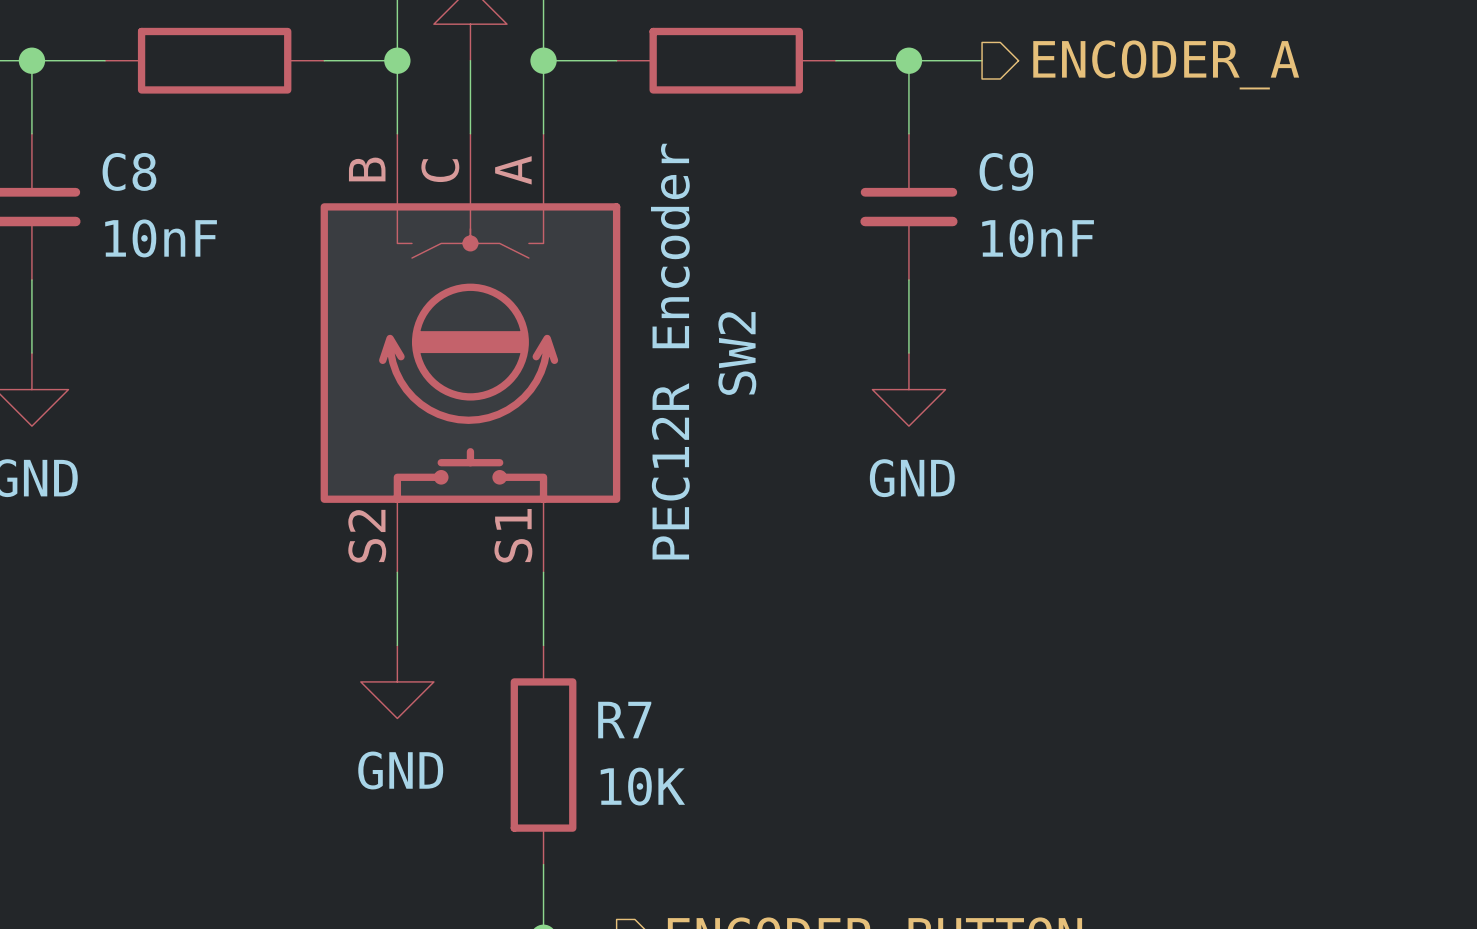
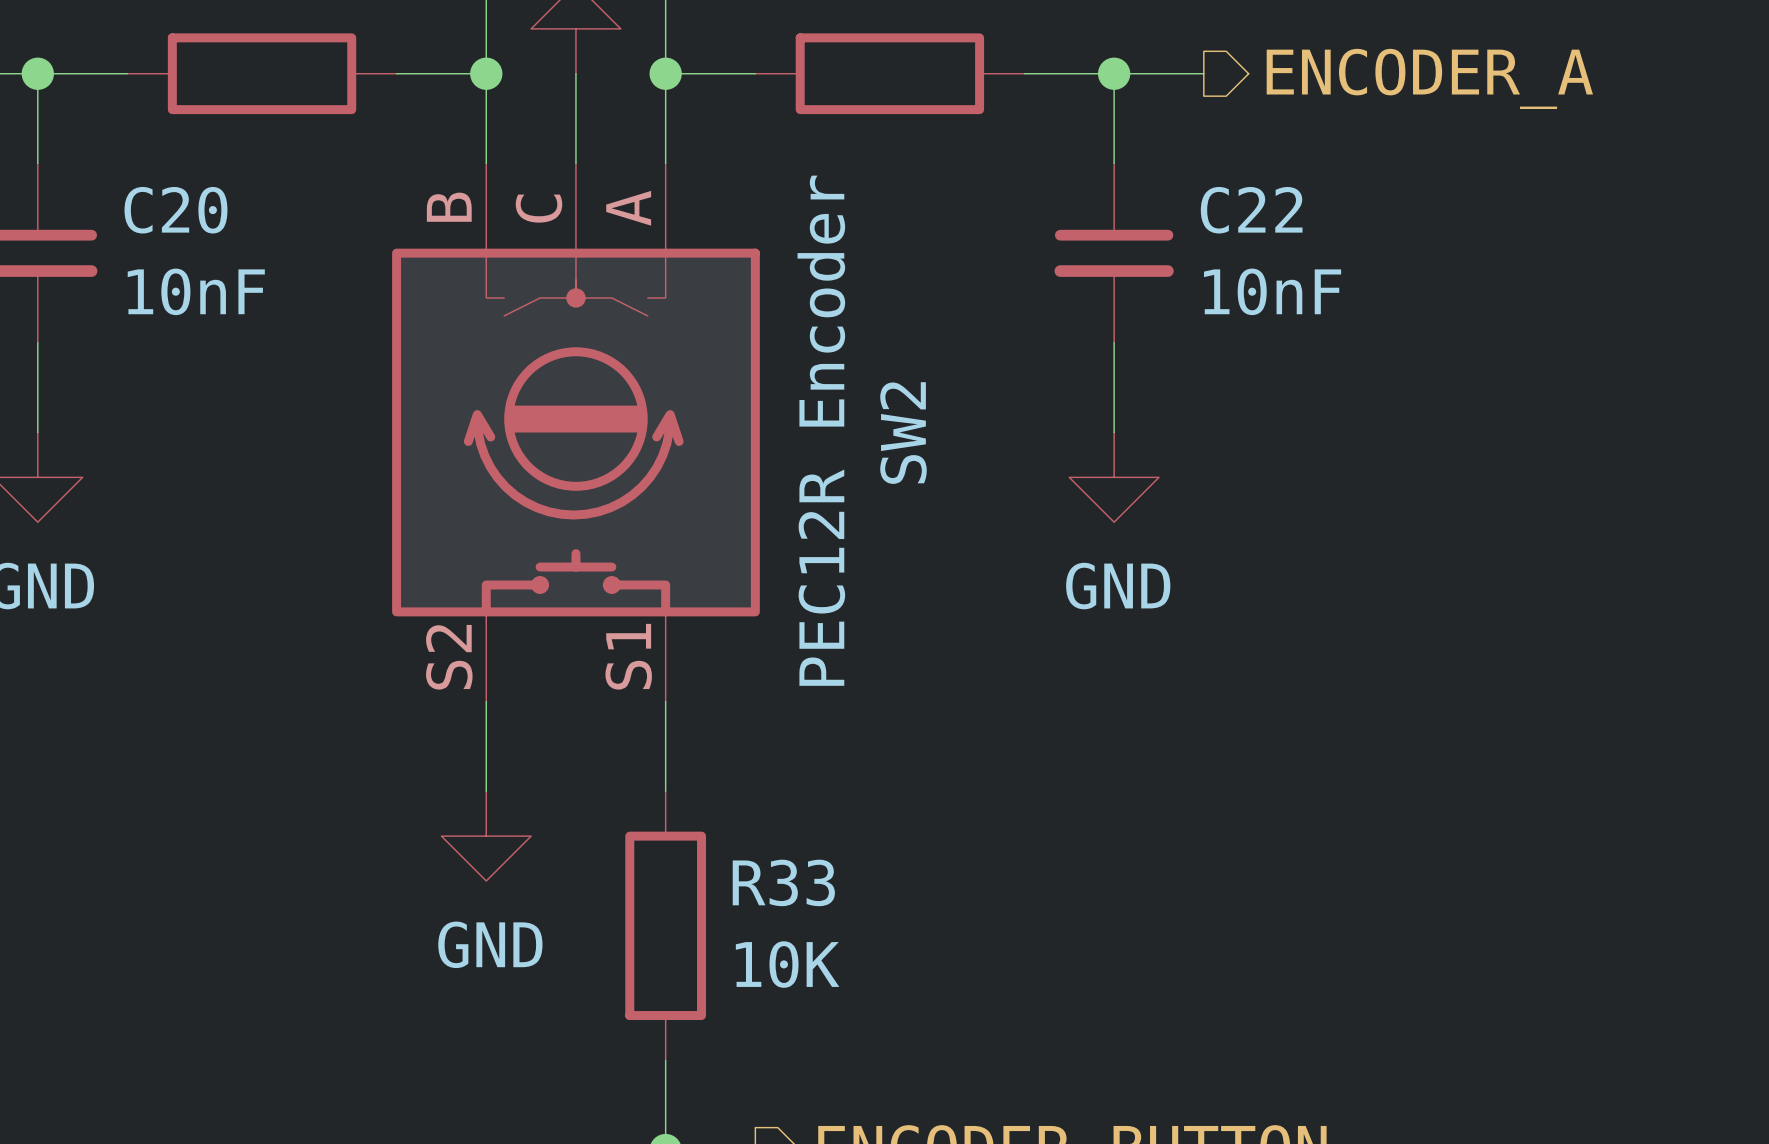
C8 name: C8 (129, 171) -> C20 (175, 210)
C9 name: C9 (1006, 171) -> C22 (1251, 210)
R7 name: R7 (624, 720) -> R33 (783, 882)

